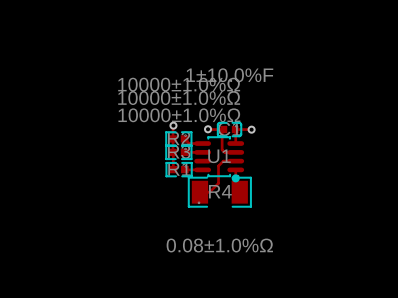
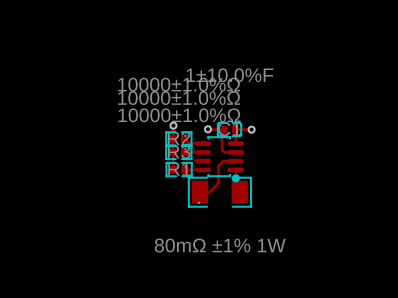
U1 name: U1 (219, 156) -> none
R4 name: R4 (220, 191) -> none
R4 value: 0.08±1.0%Ω (219, 245) -> 80mΩ ±1% 1W (220, 245)

